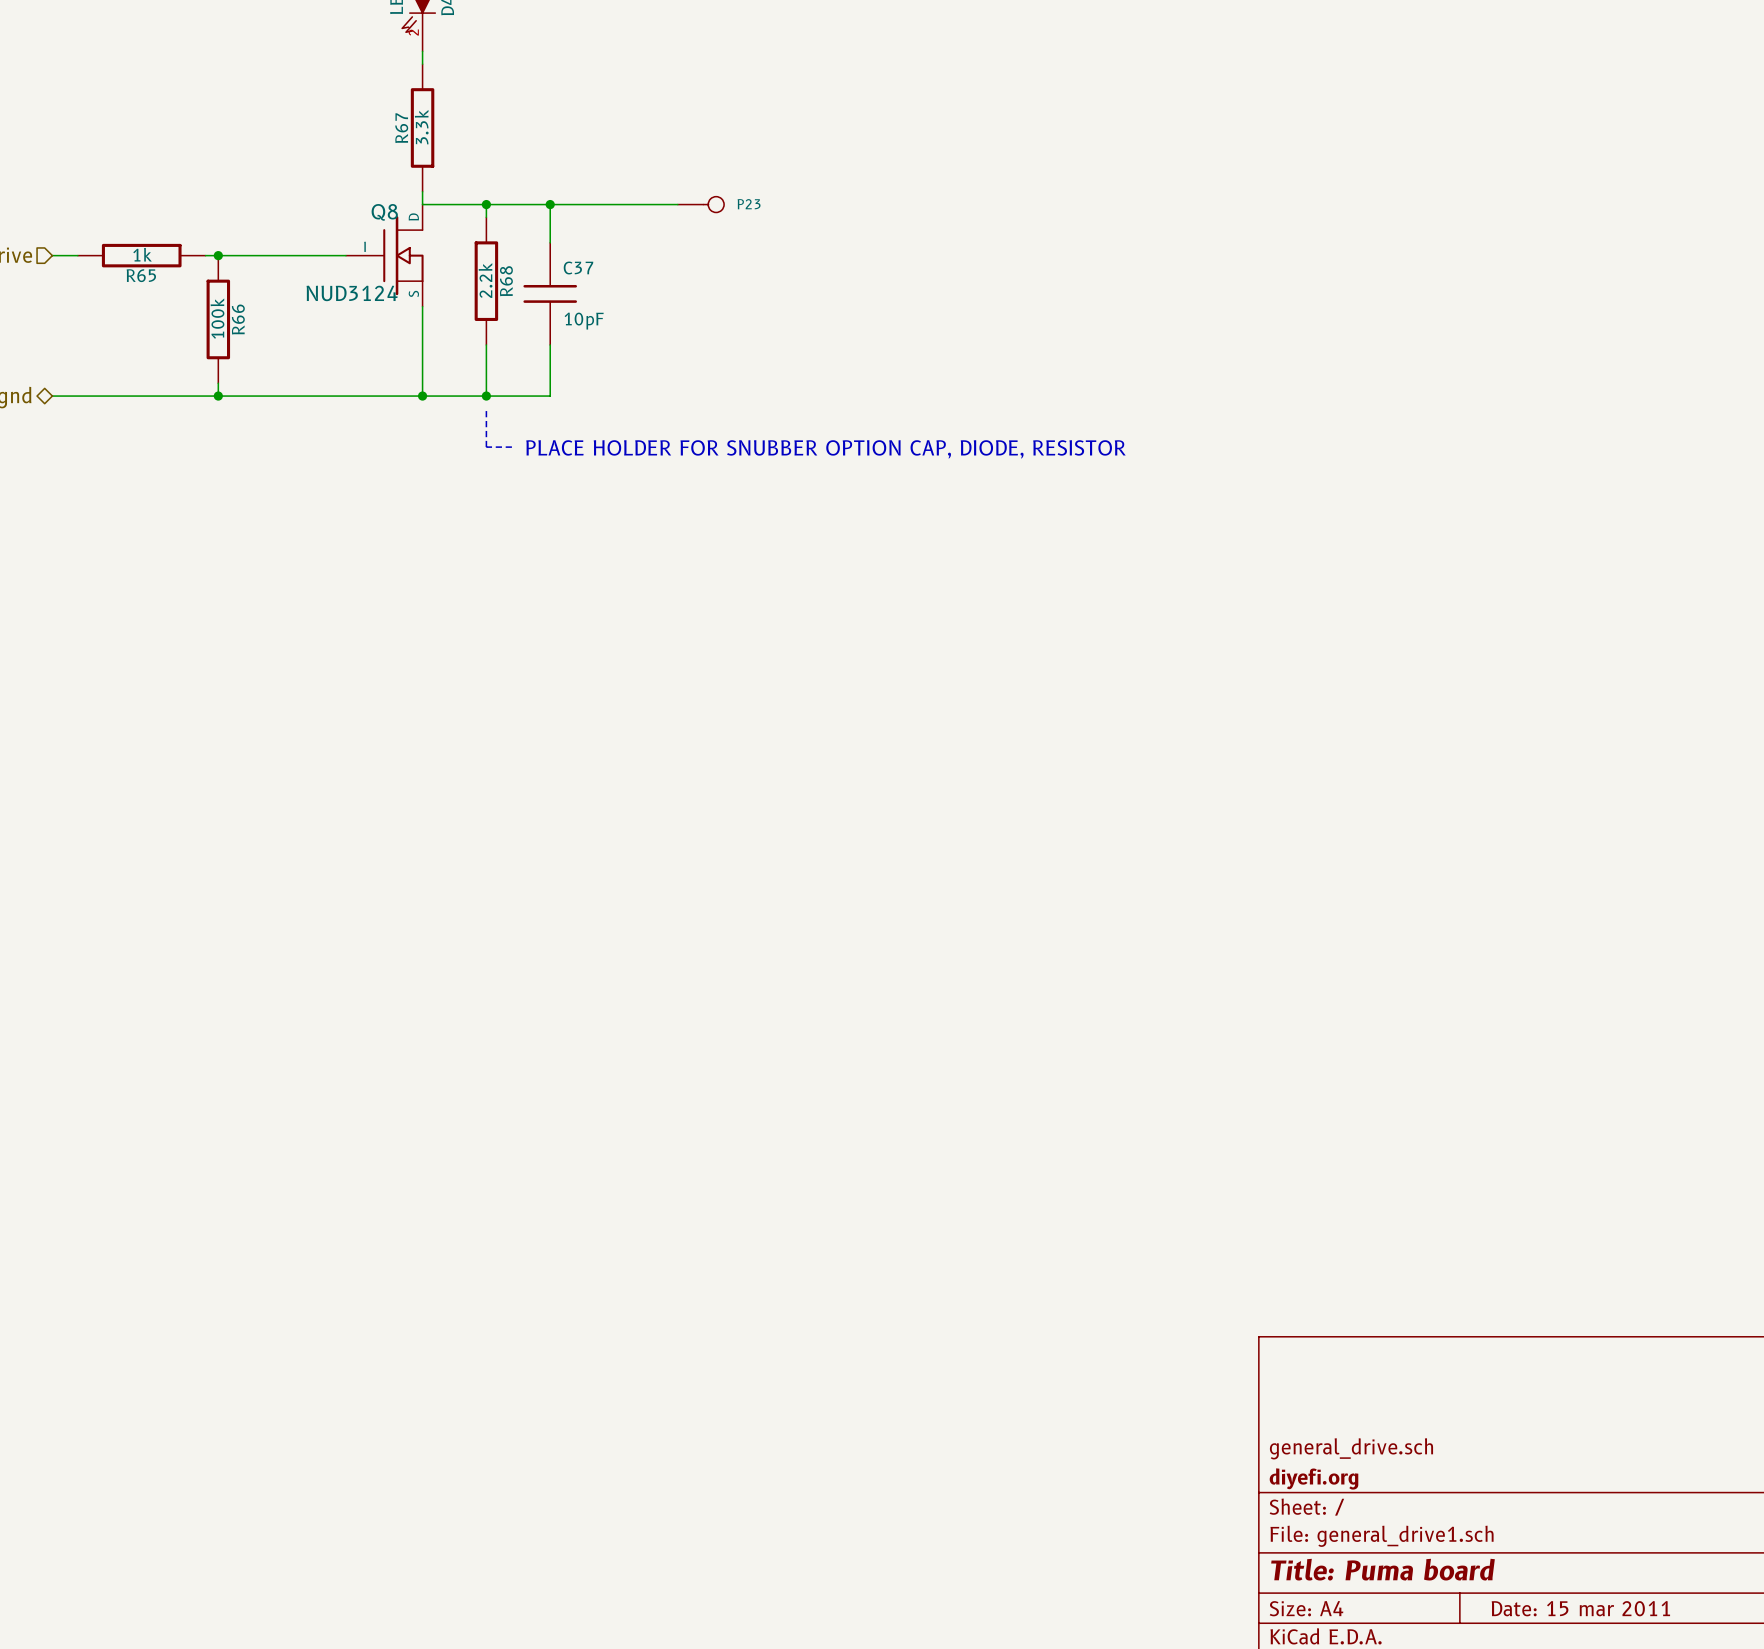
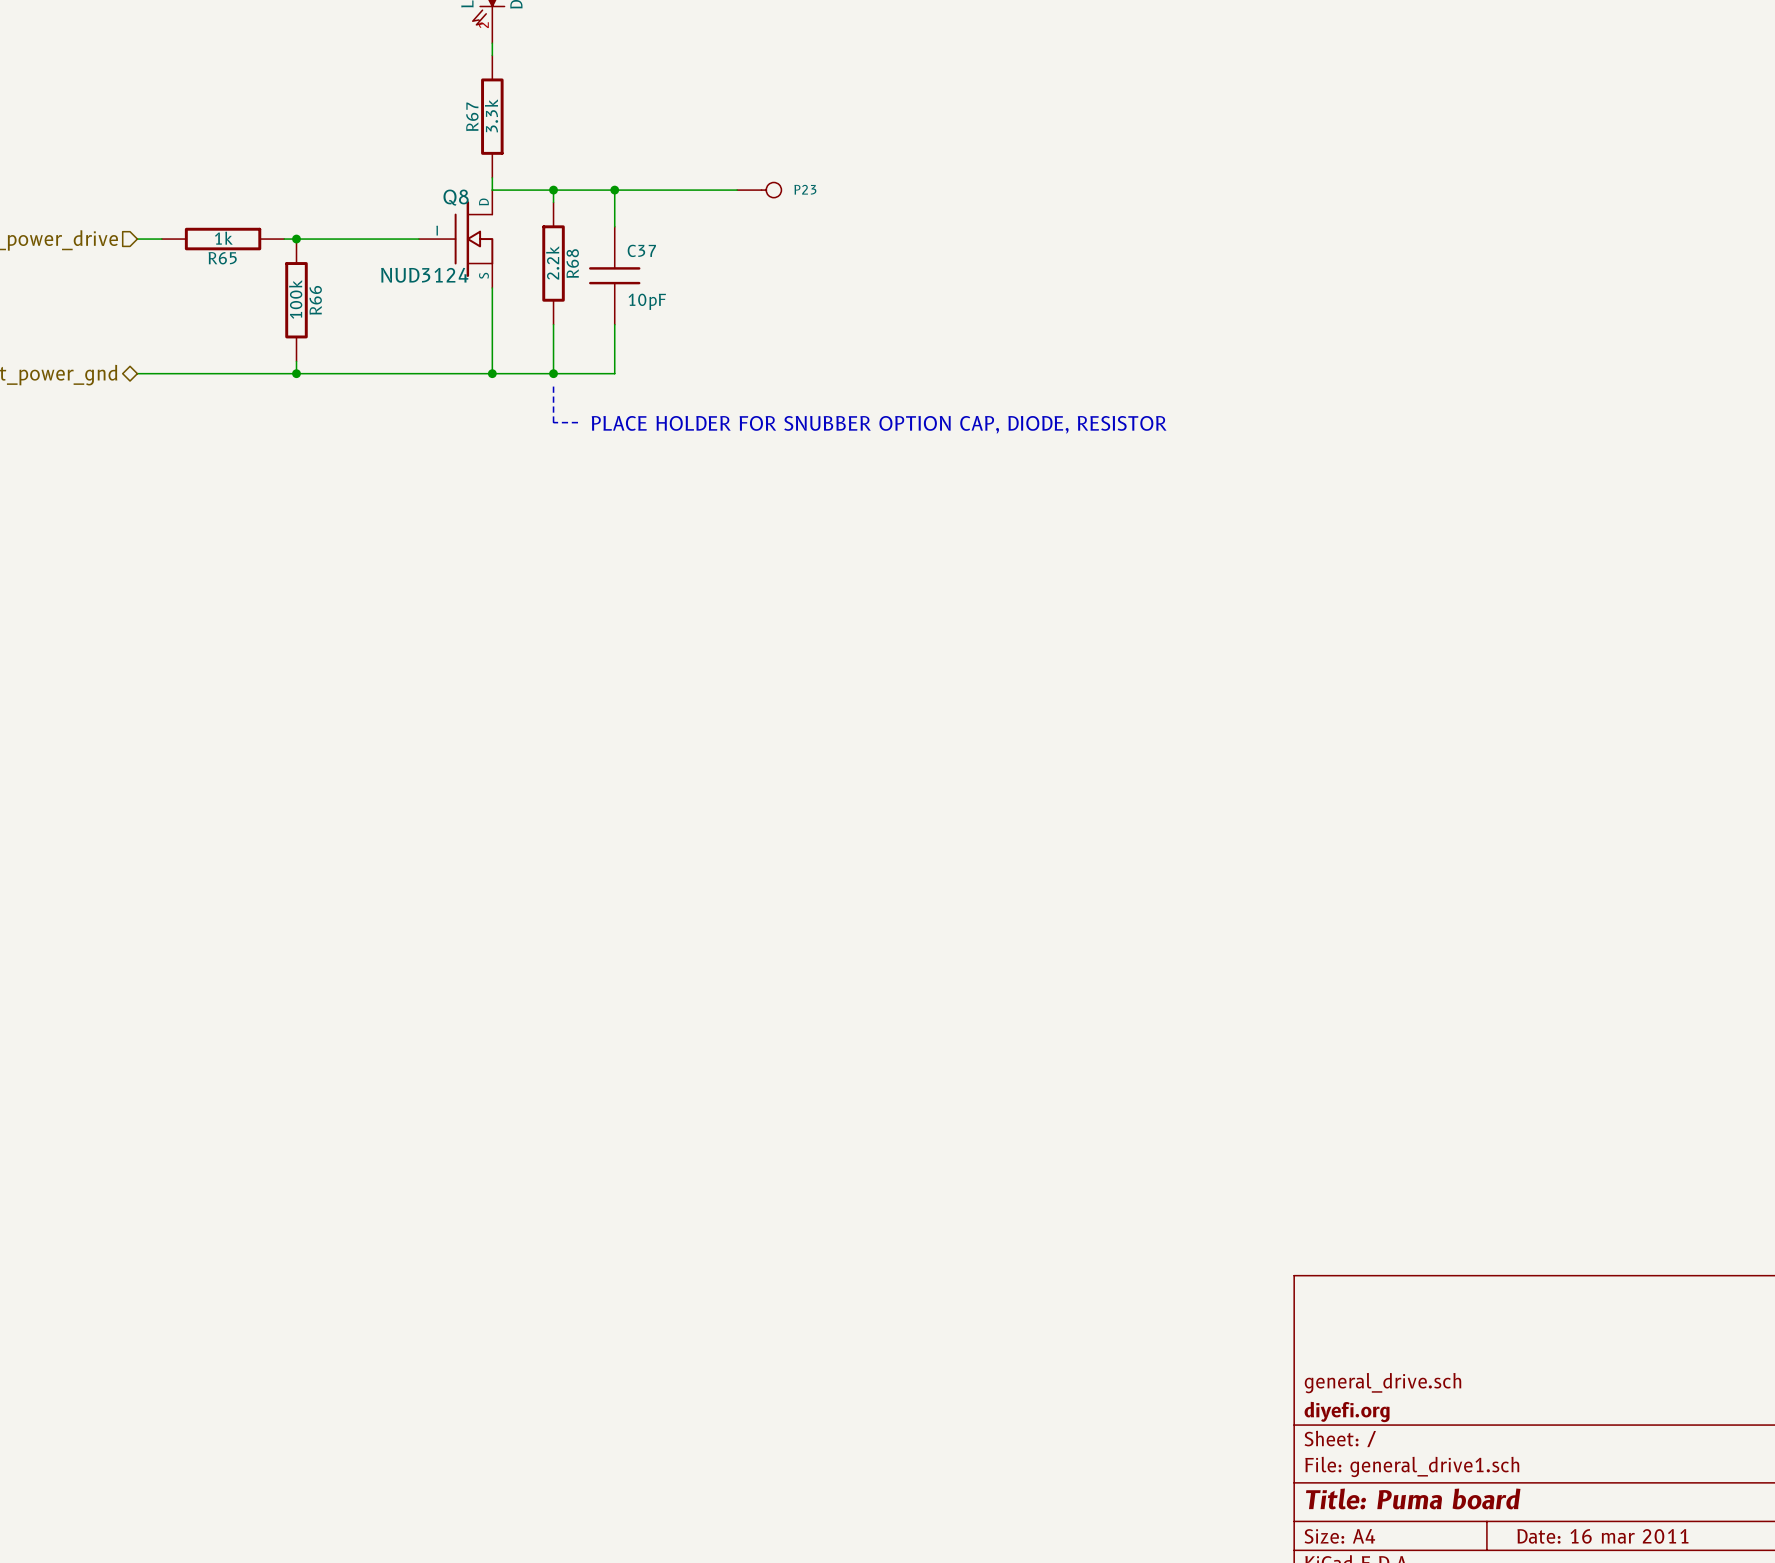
title block: Date: 15 mar 2011 (1580, 1608) -> Date: 16 mar 2011 (1602, 1536)

